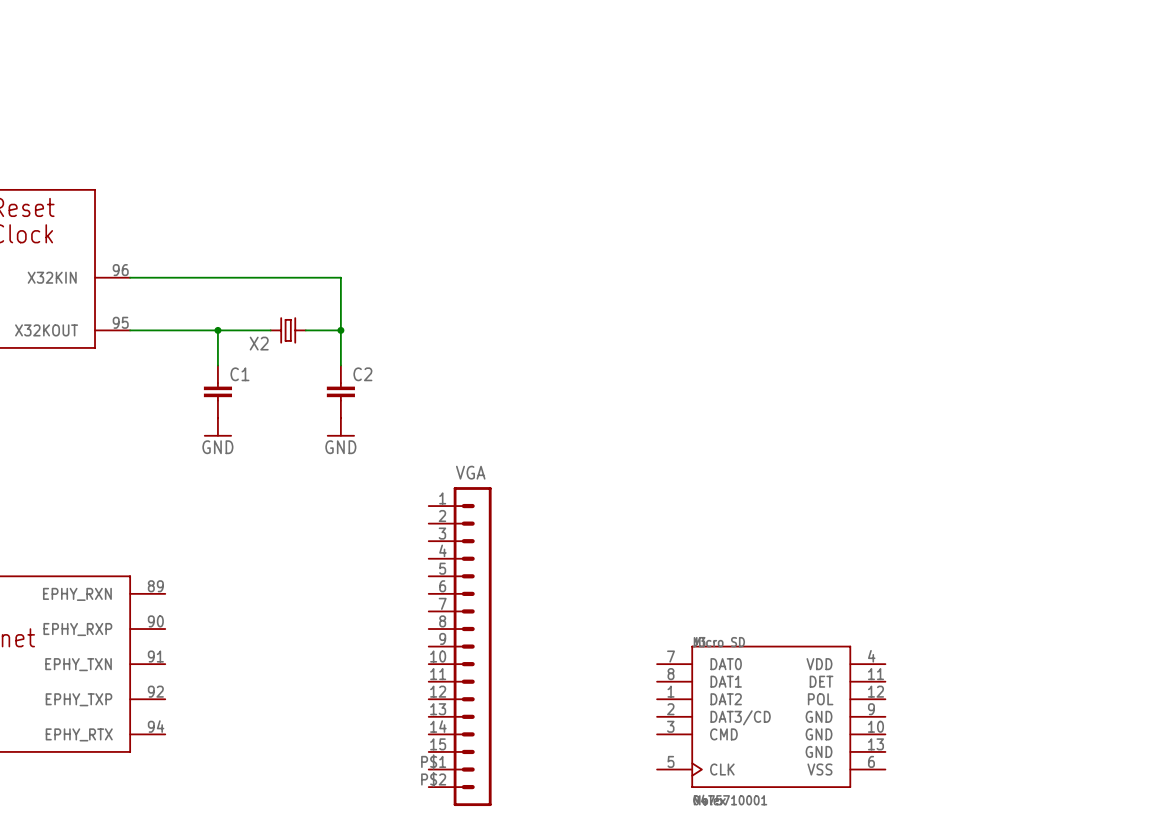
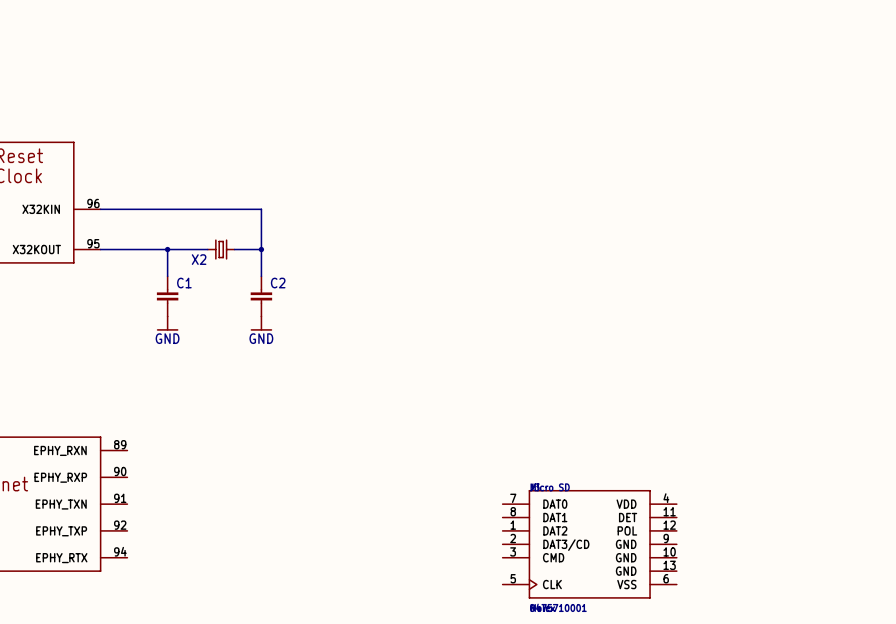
part: (460, 646) -> none

